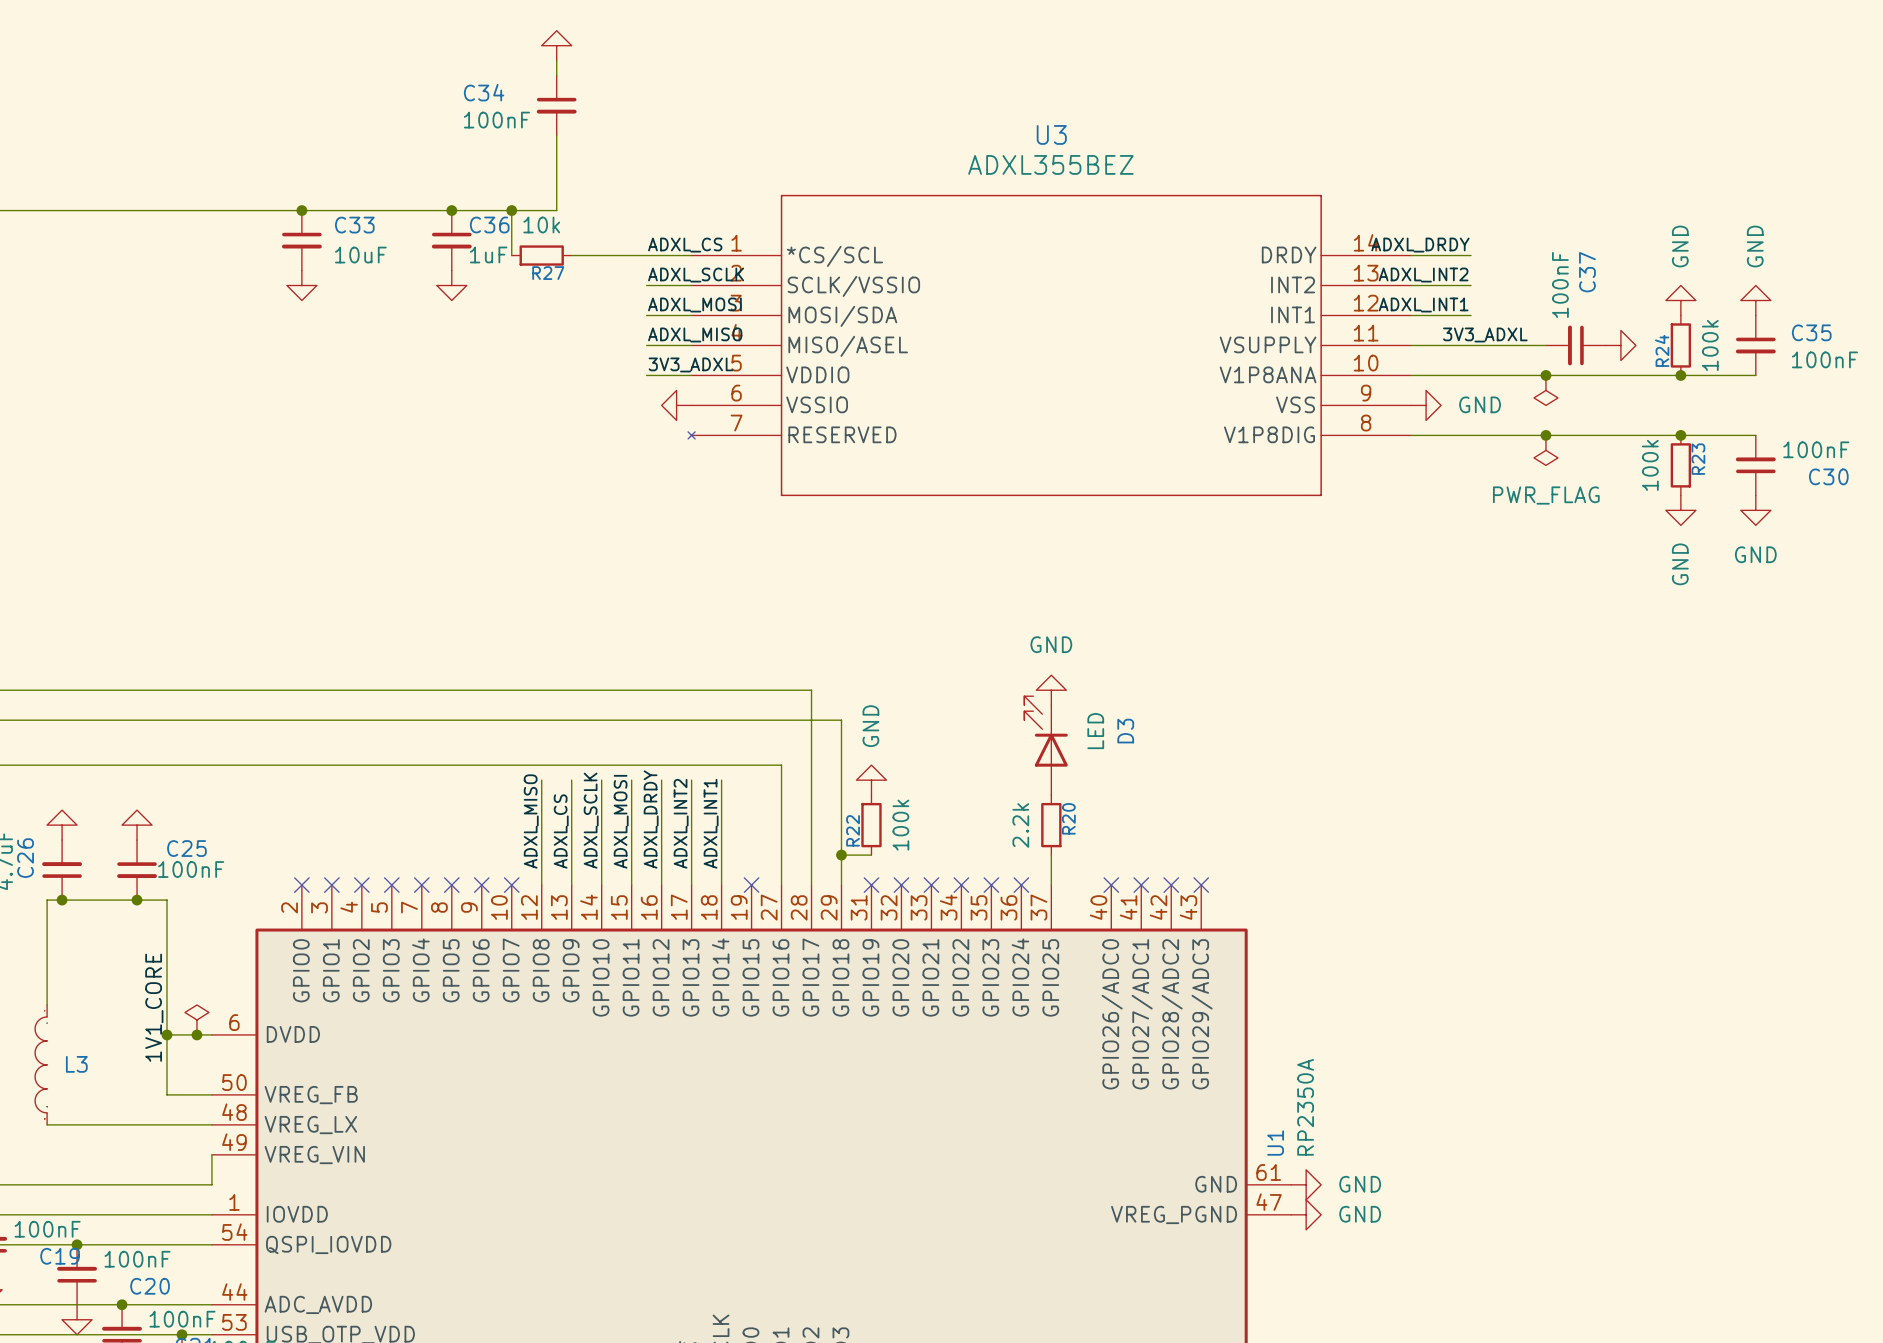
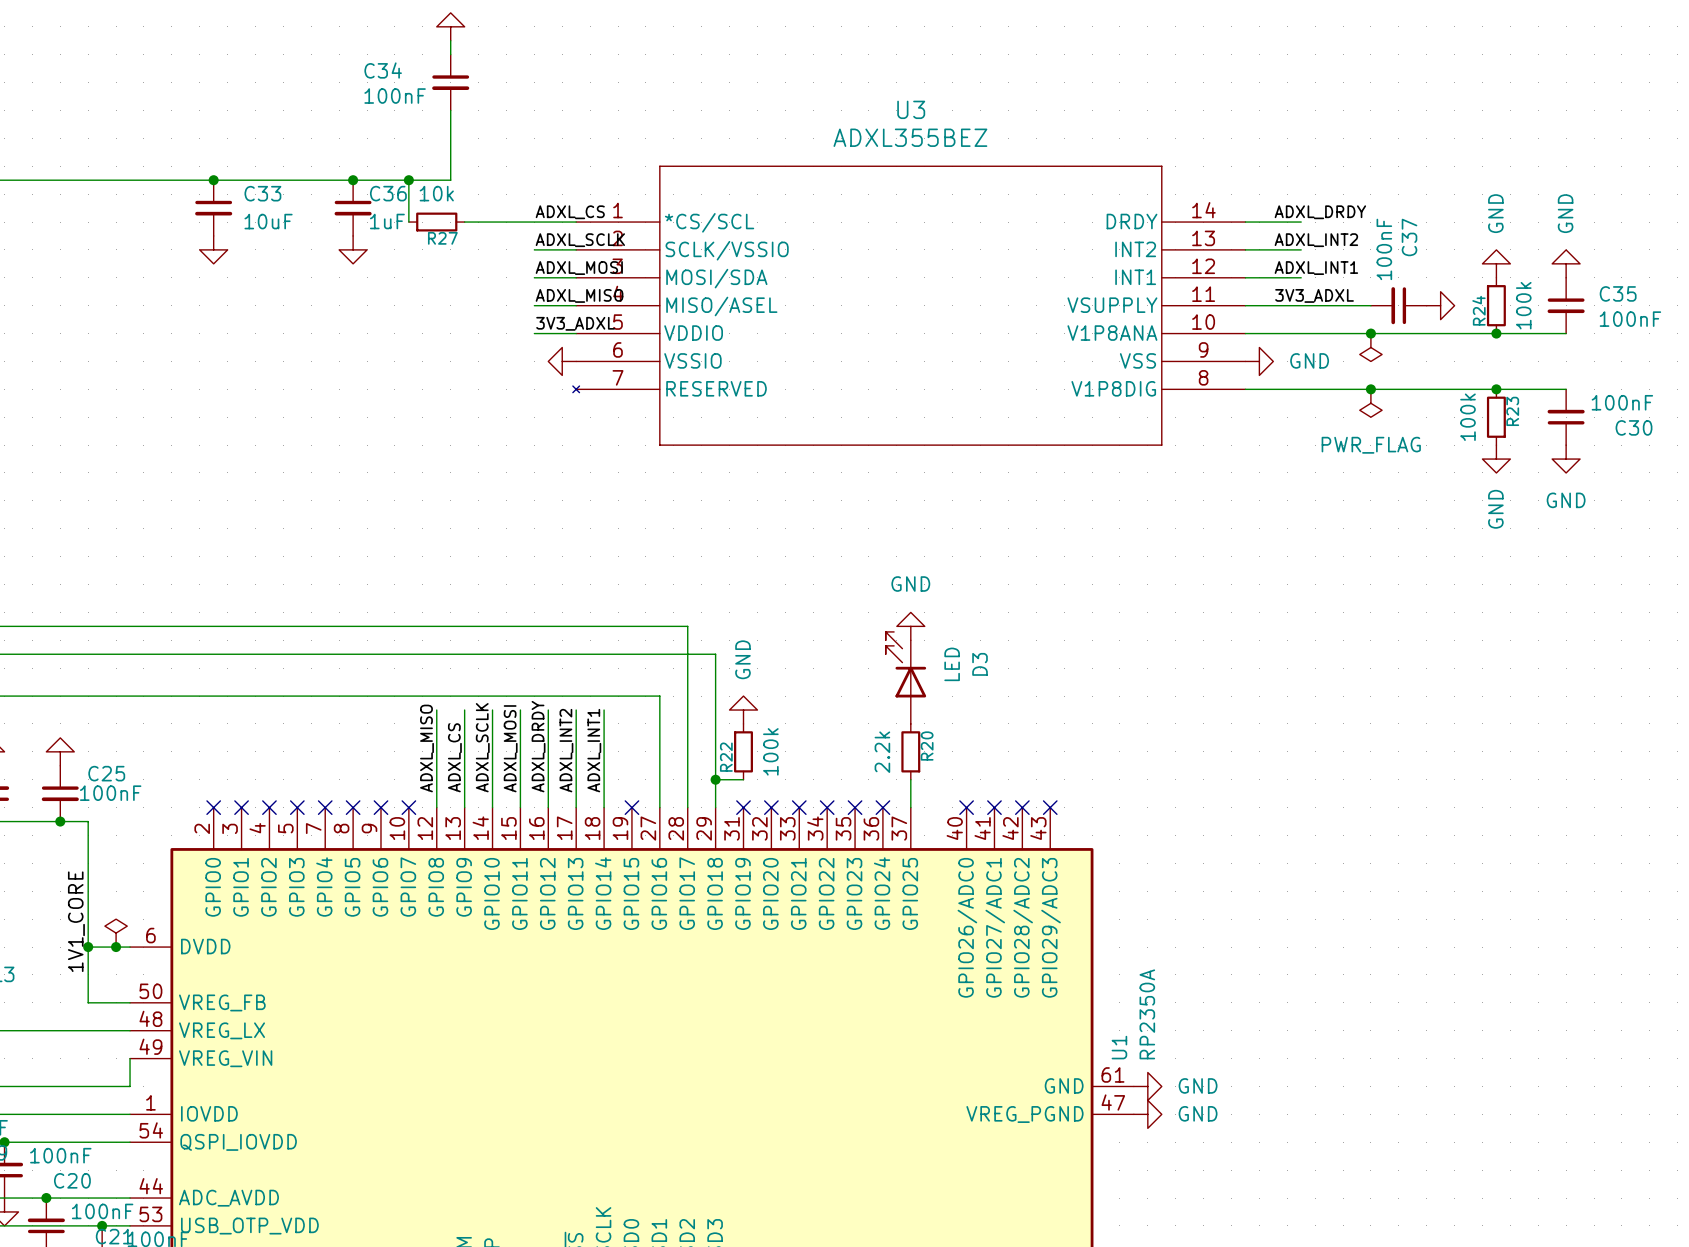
label position: ADXL_DRDY (1420, 245) -> ADXL_DRDY (1320, 212)
label position: ADXL_INT2 (1423, 275) -> ADXL_INT2 (1316, 240)
label position: ADXL_INT1 (1423, 305) -> ADXL_INT1 (1316, 268)

